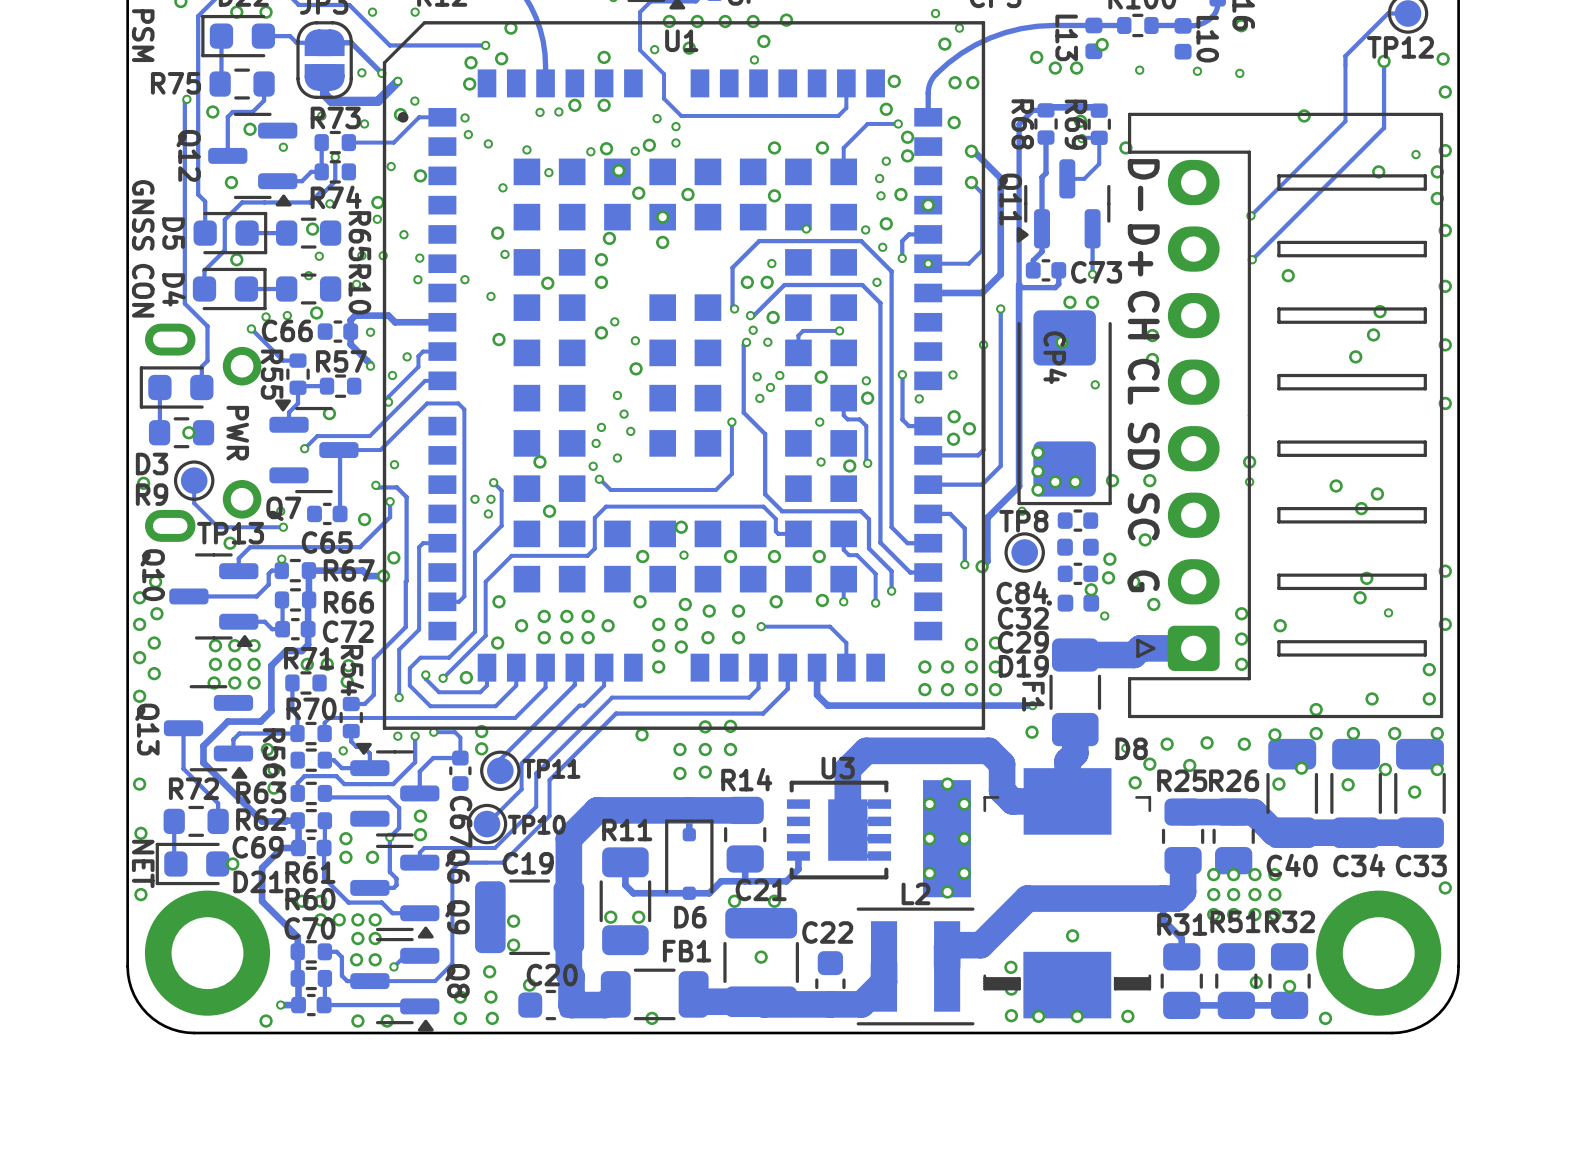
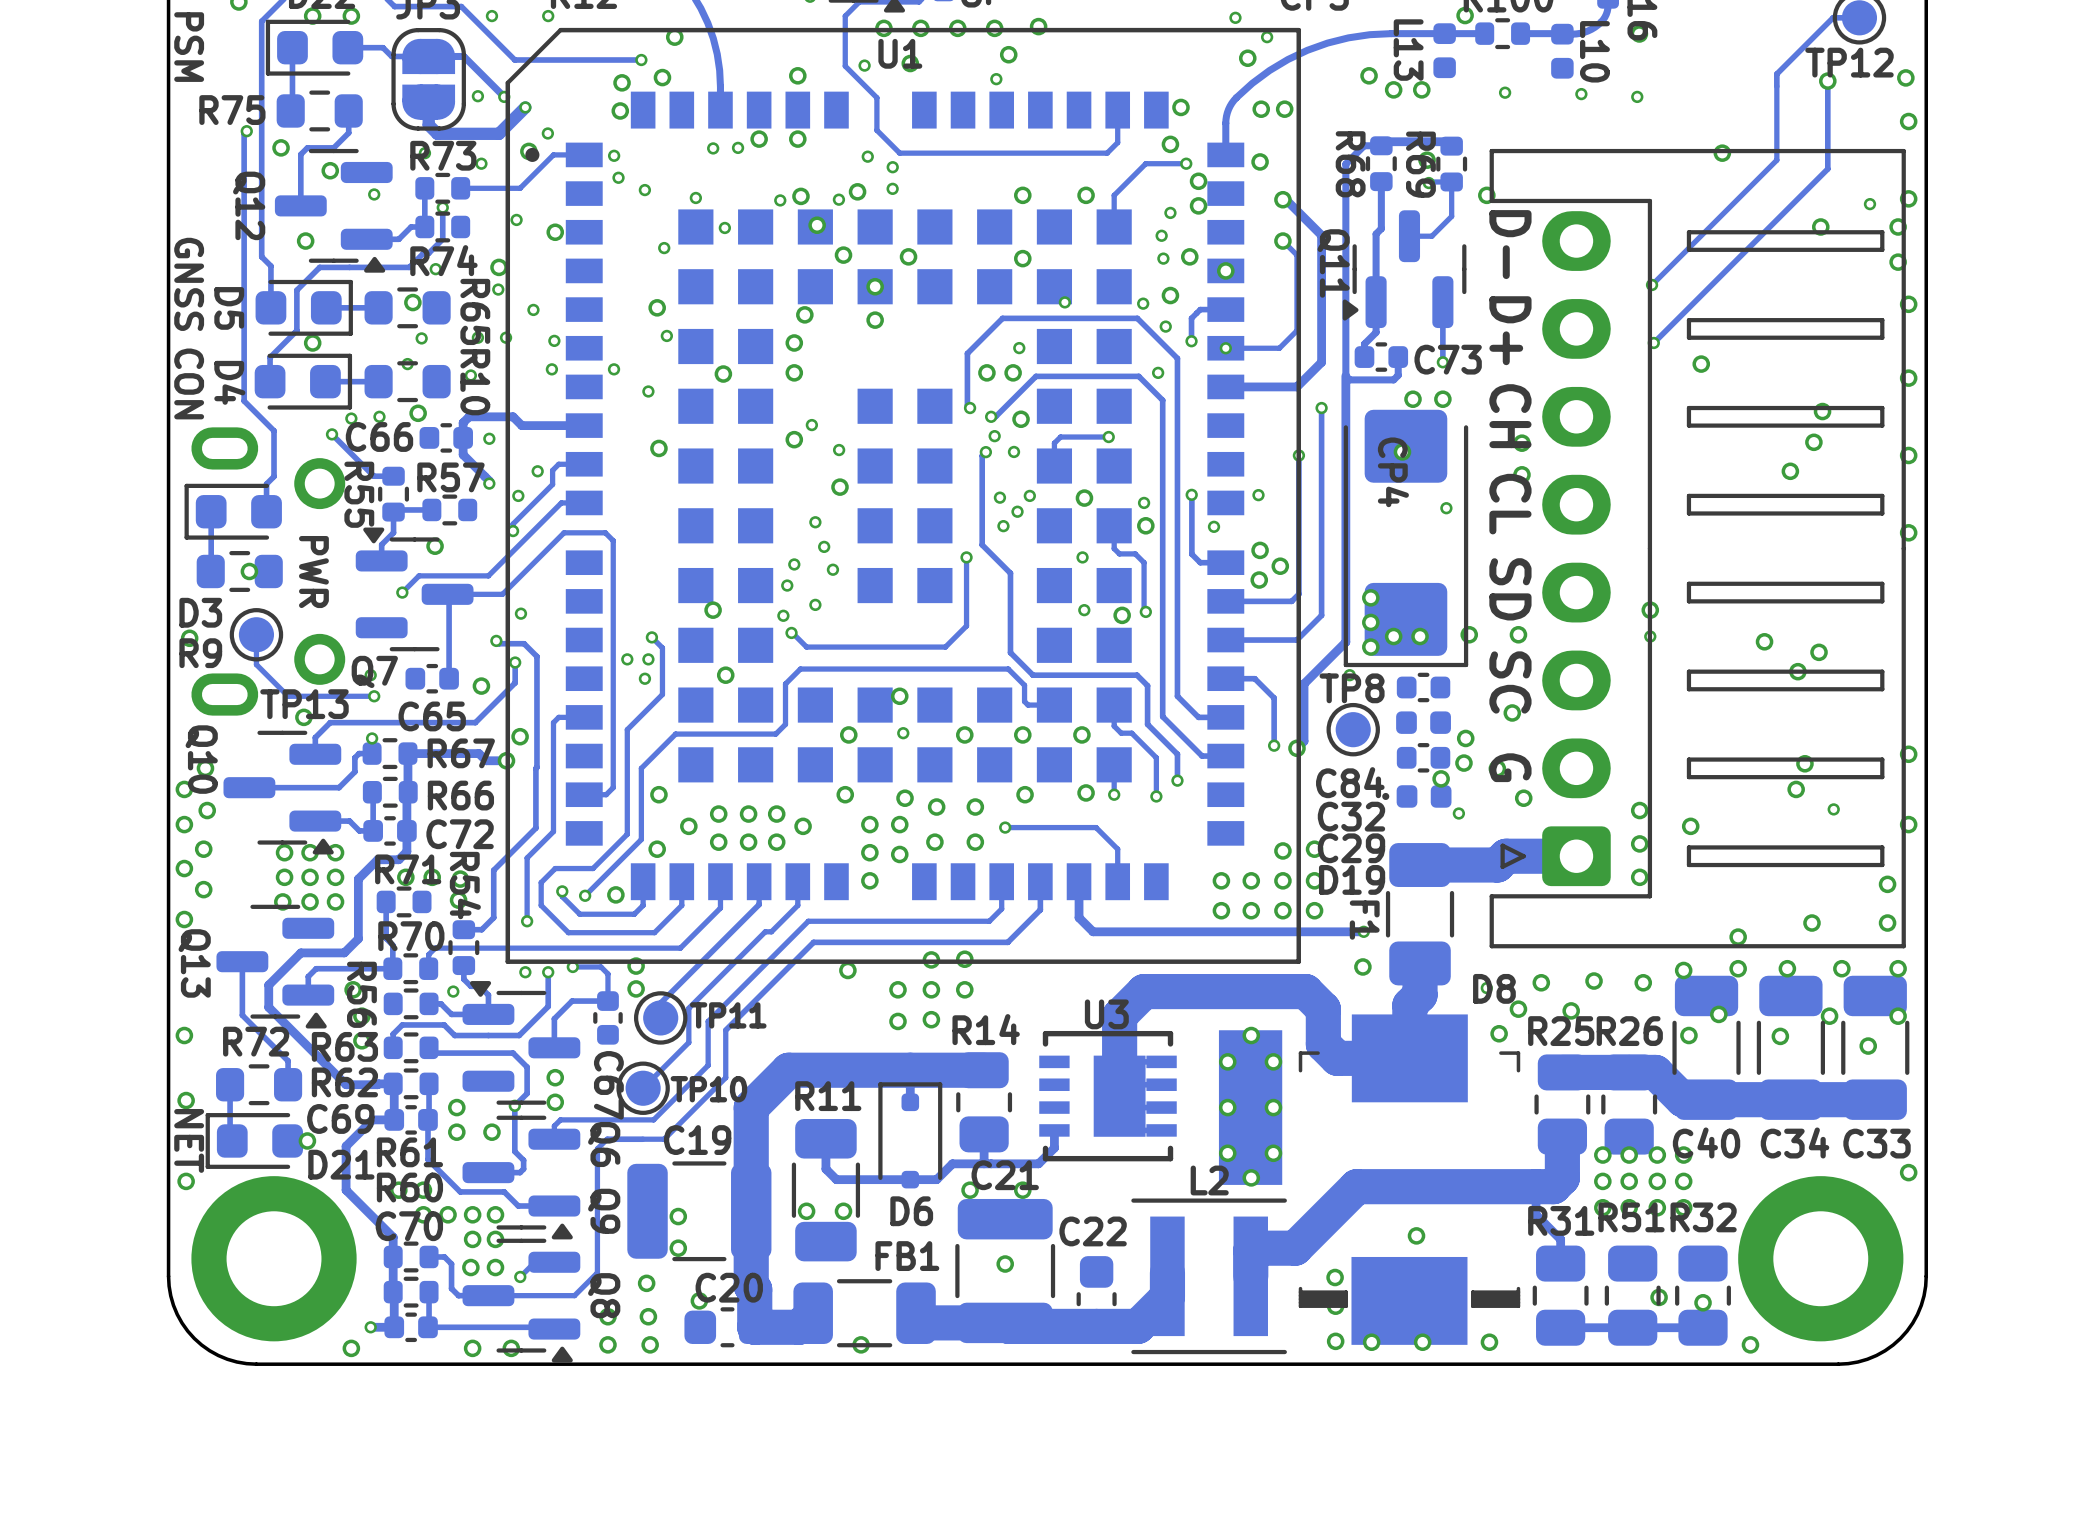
via position: (1102, 44) -> (1465, 15)

